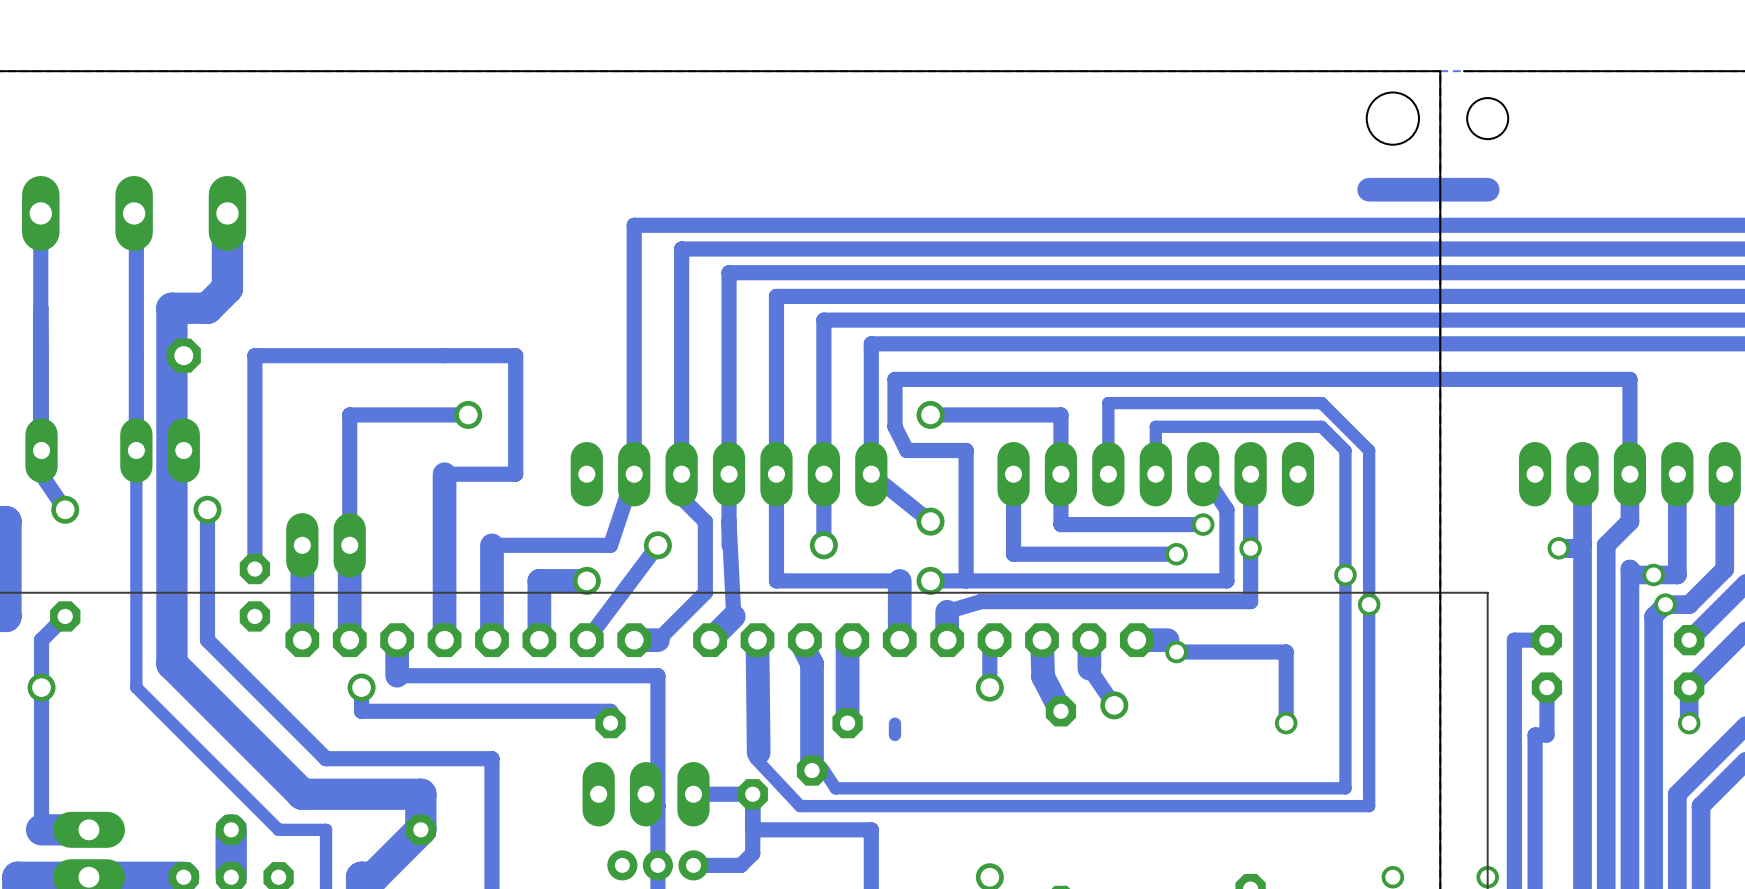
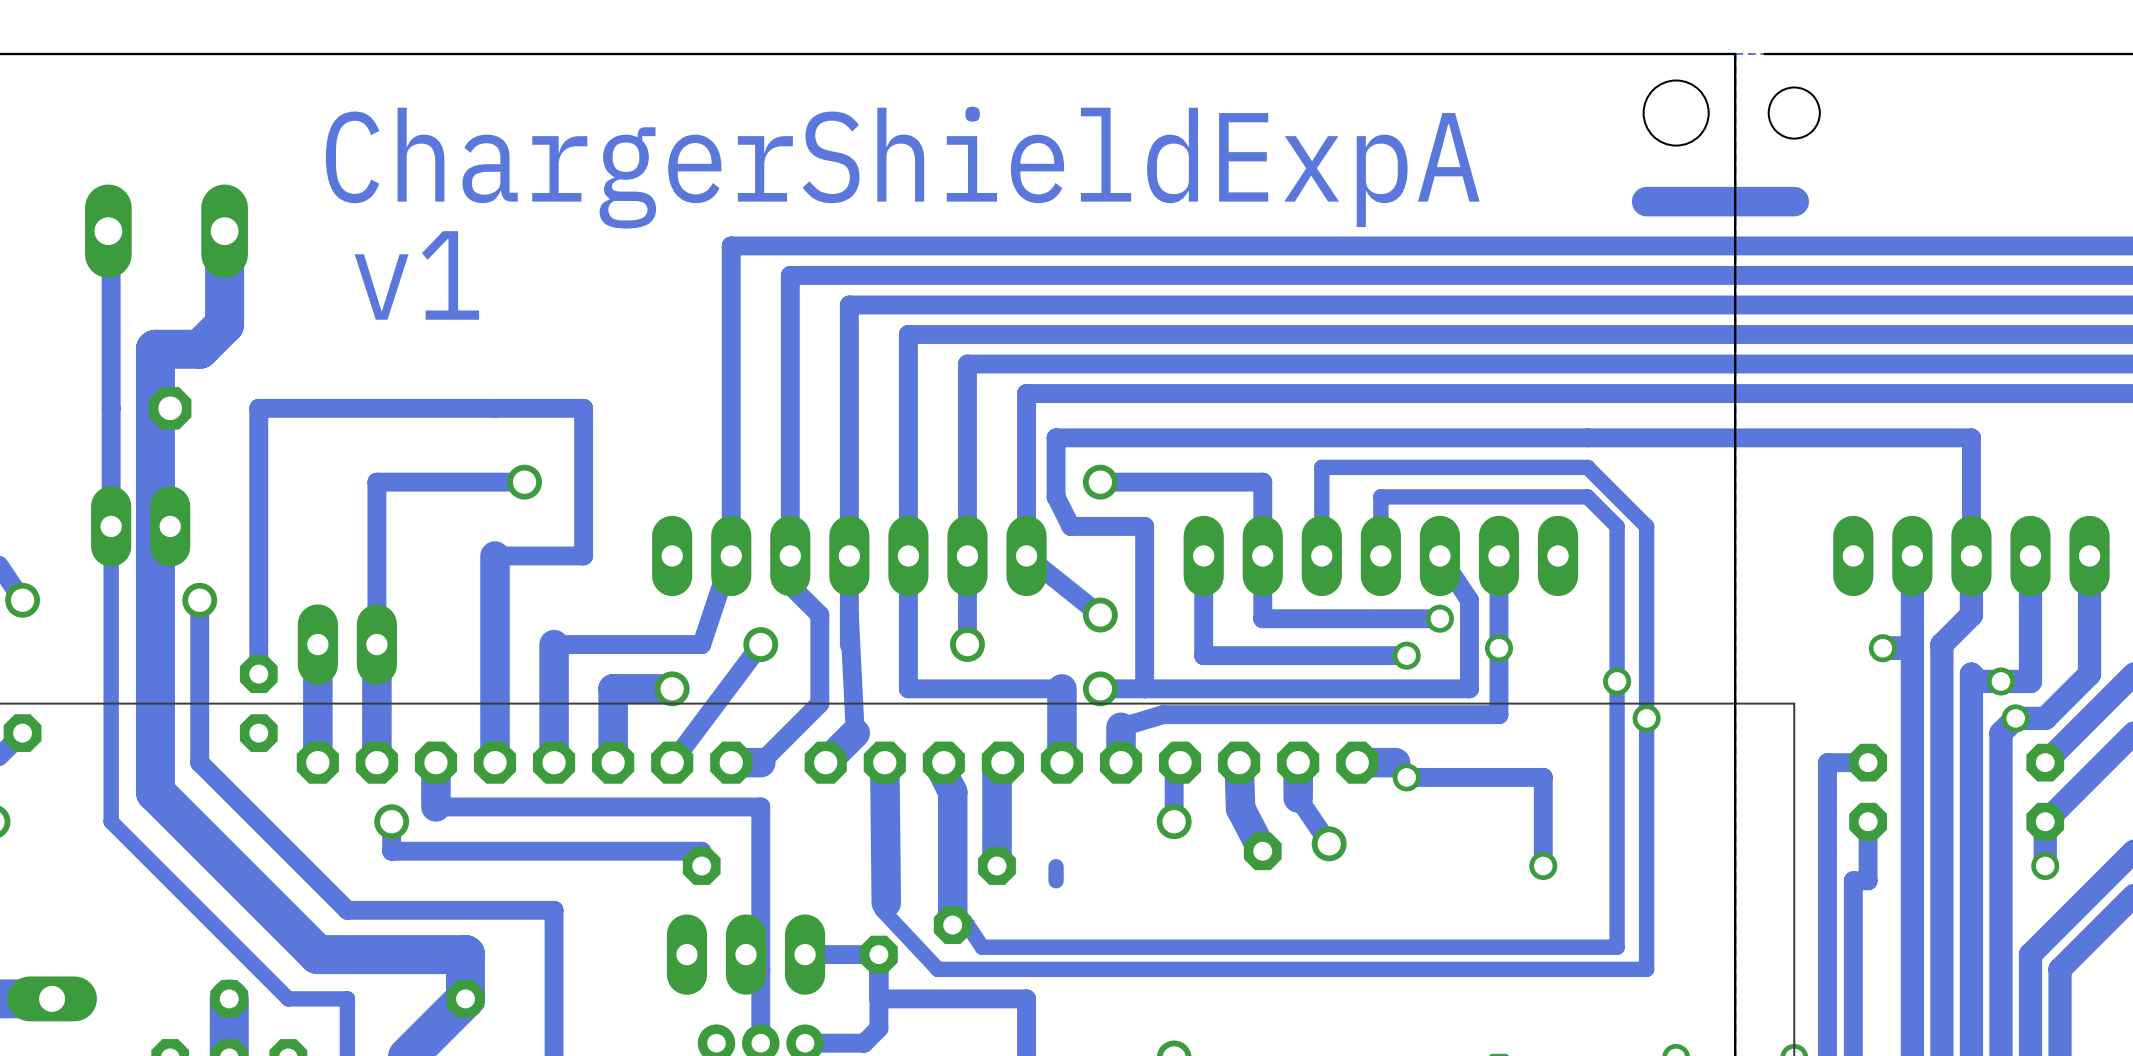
text: none -> ChargerShieldExpA (902, 167)
text: none -> v1 (416, 275)

